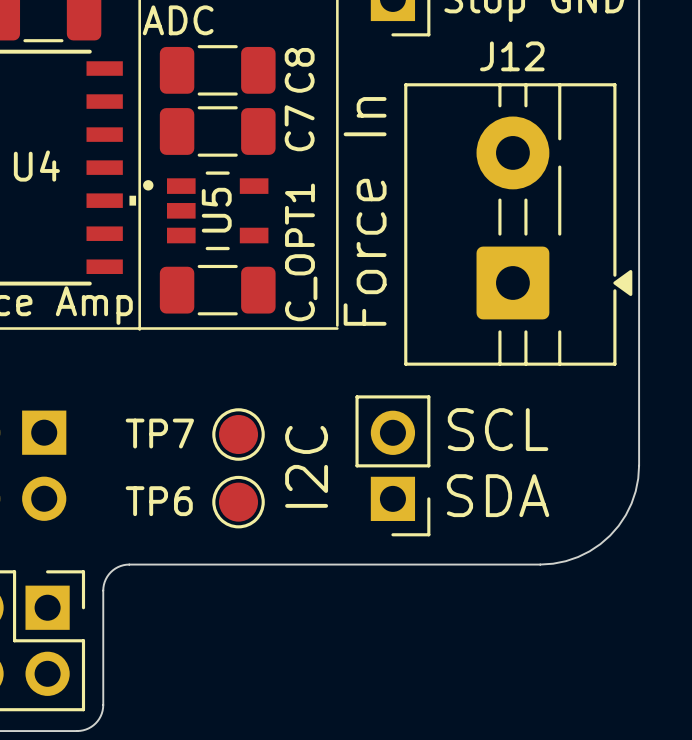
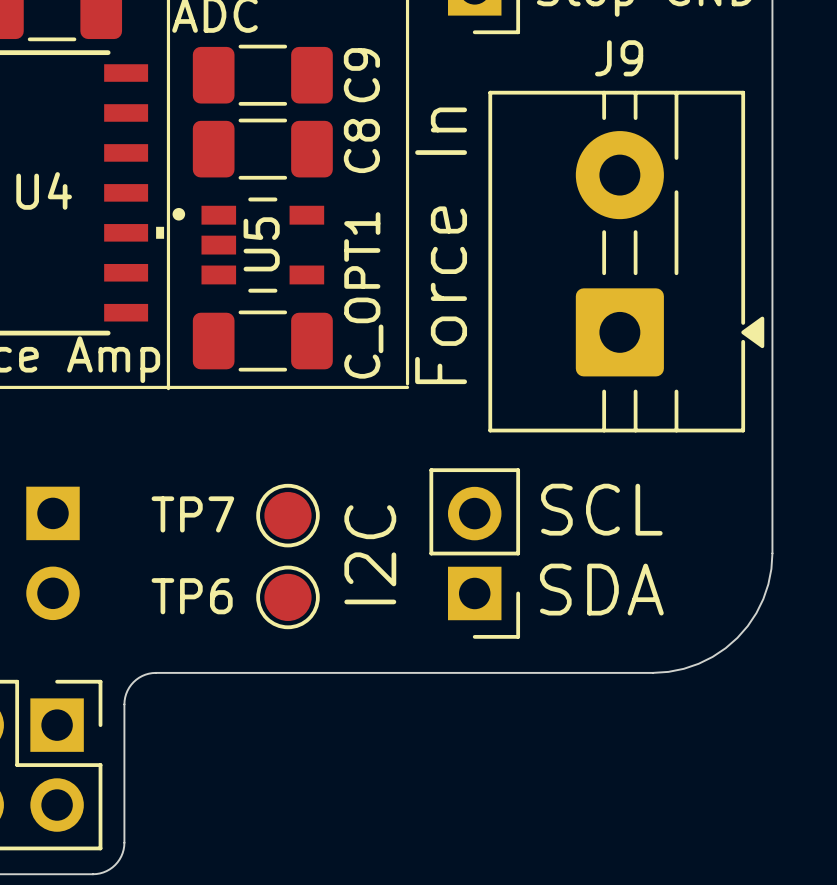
J12 name: J12 (512, 56) -> J9 (619, 58)
C8 name: C8 (299, 70) -> C9 (361, 75)
C7 name: C7 (299, 128) -> C8 (361, 145)

